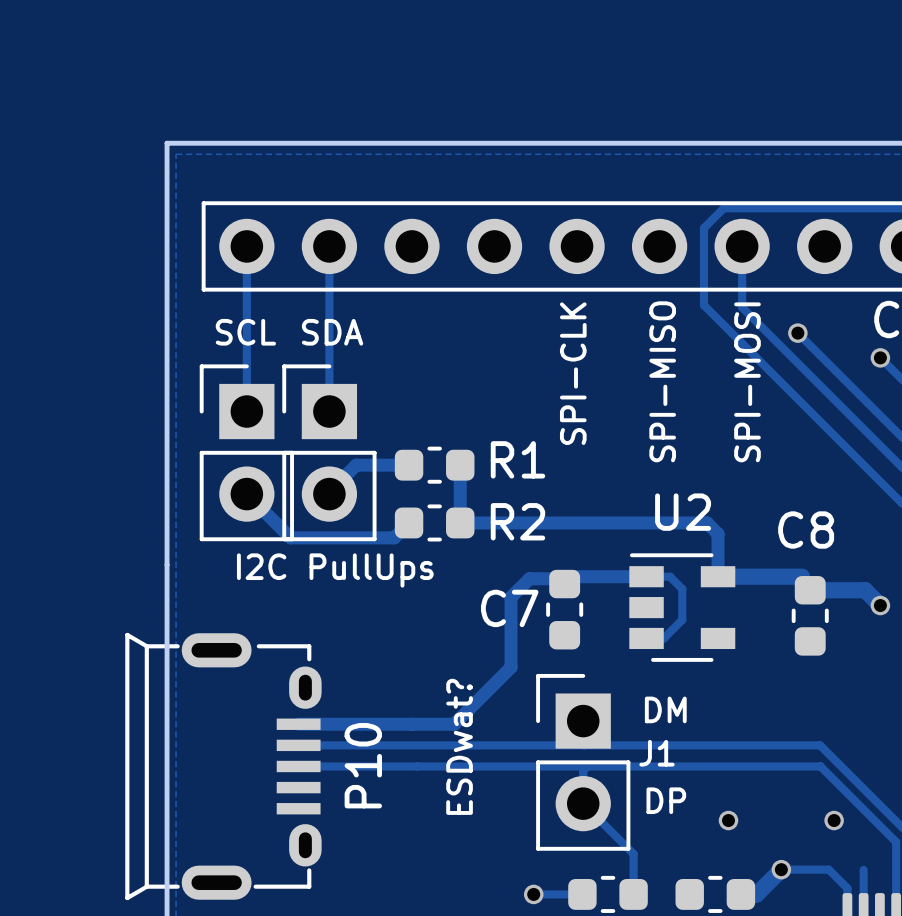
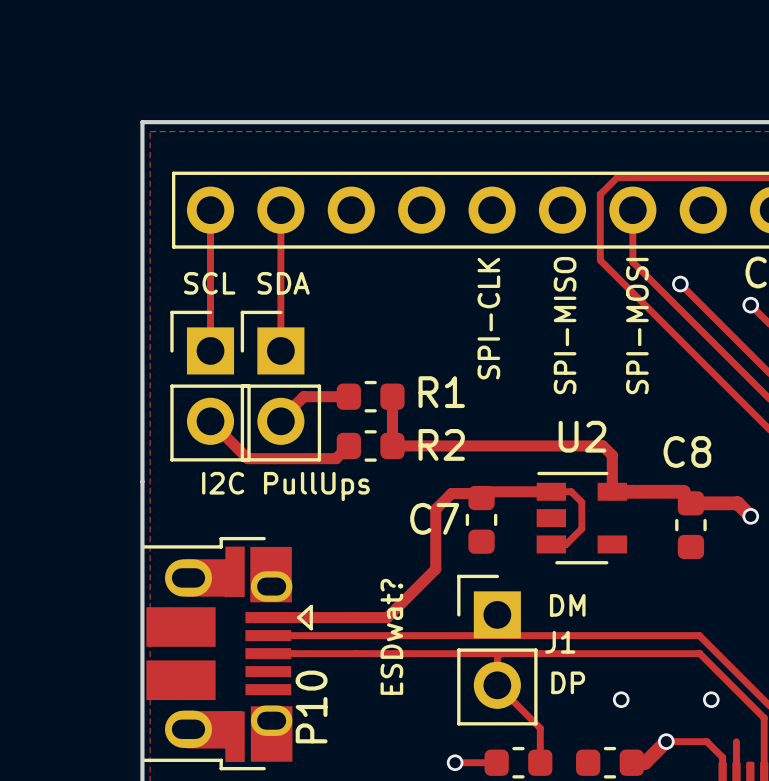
P10 footprint: [125, 632, 322, 901] -> [141, 536, 313, 771]
P10 name position: P10 (363, 765) -> P10 (311, 707)

